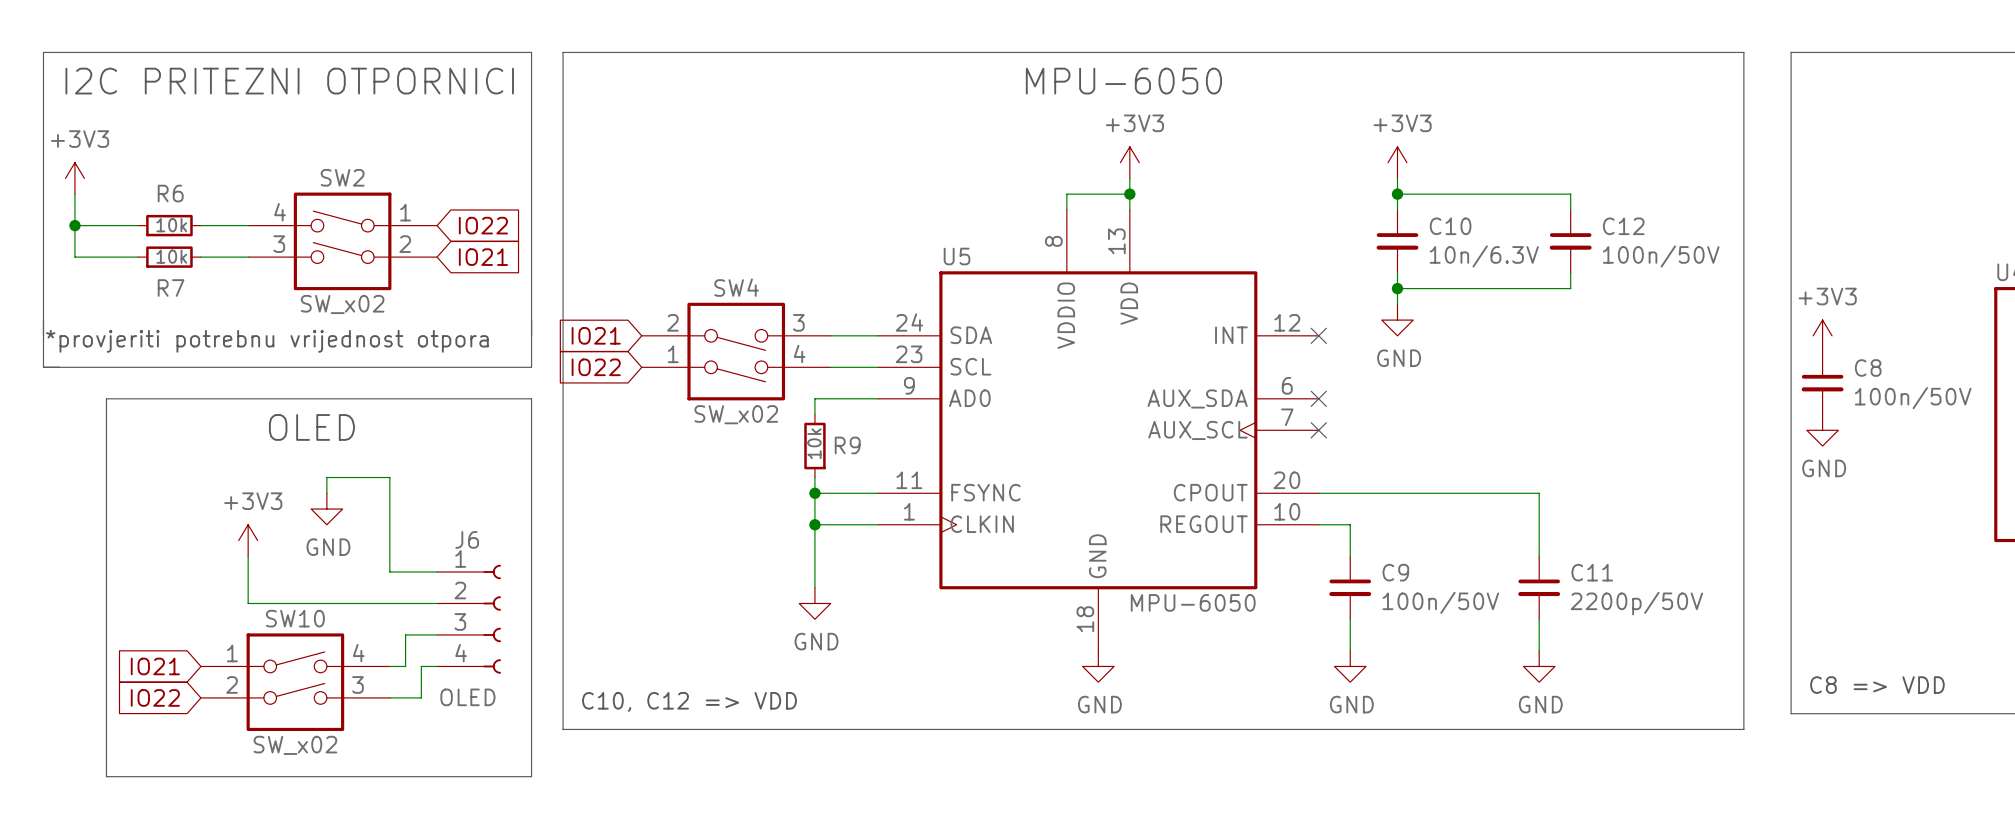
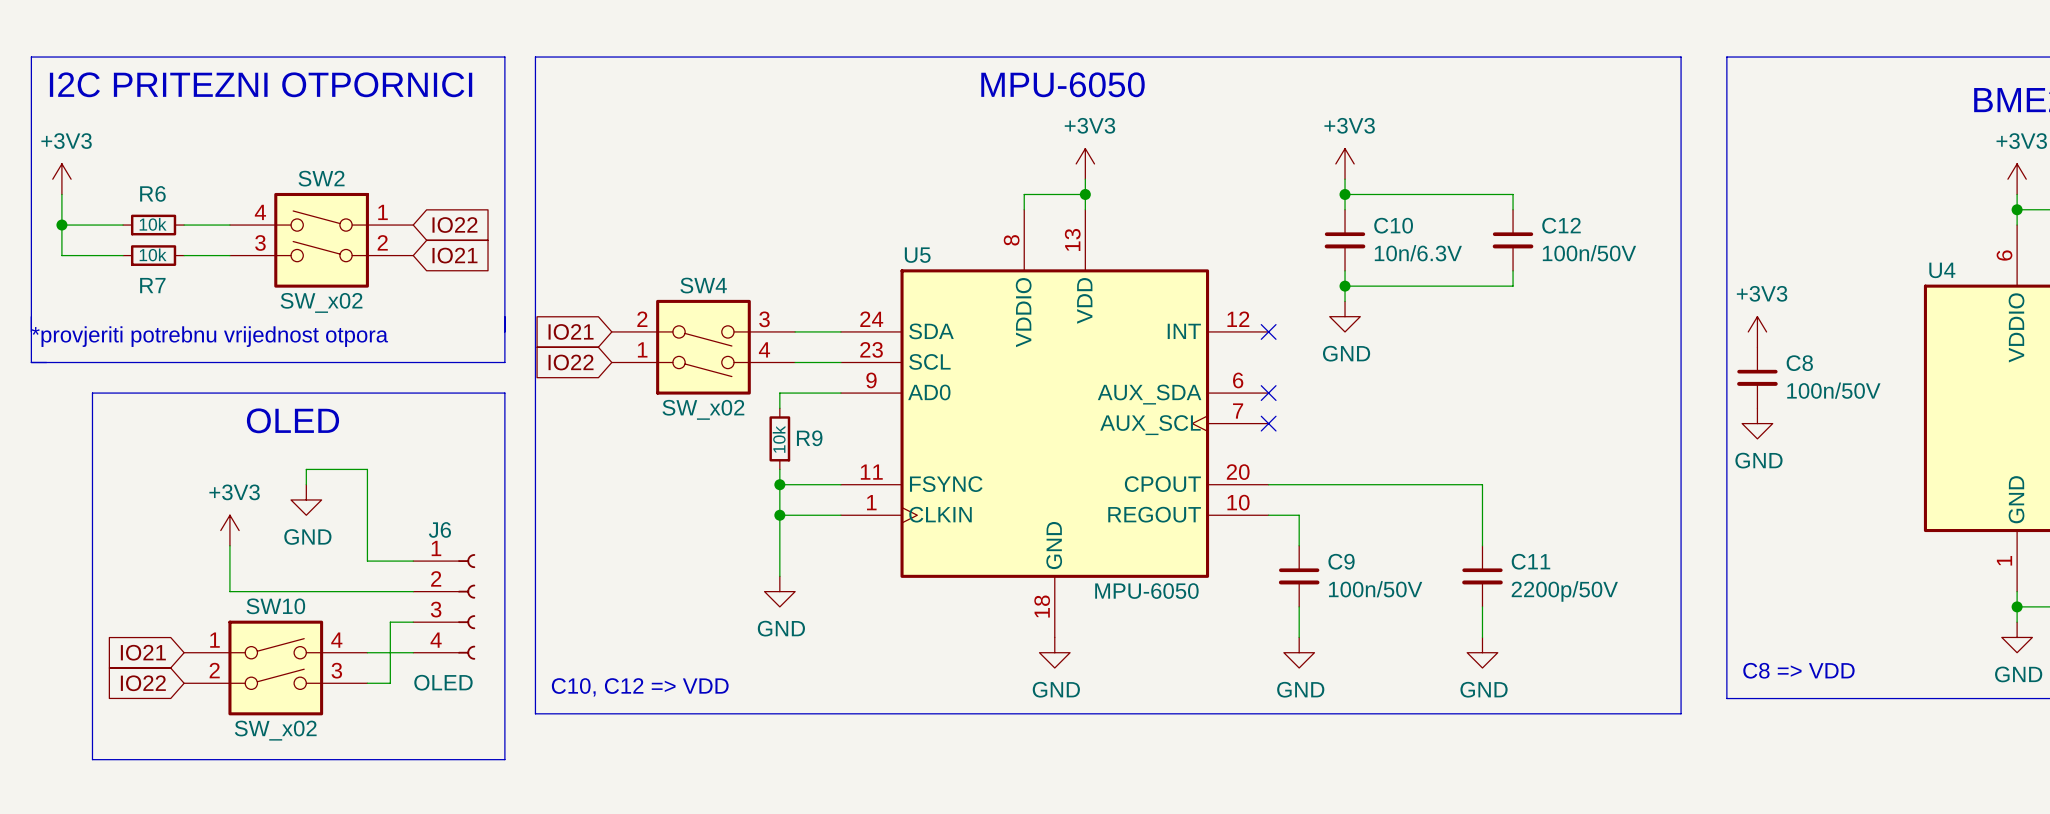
wire: (413, 634) (405, 634) (405, 666) -> (397, 652) (382, 652)
wire: (421, 666) (421, 697) (413, 697) -> (390, 622) (390, 683)

